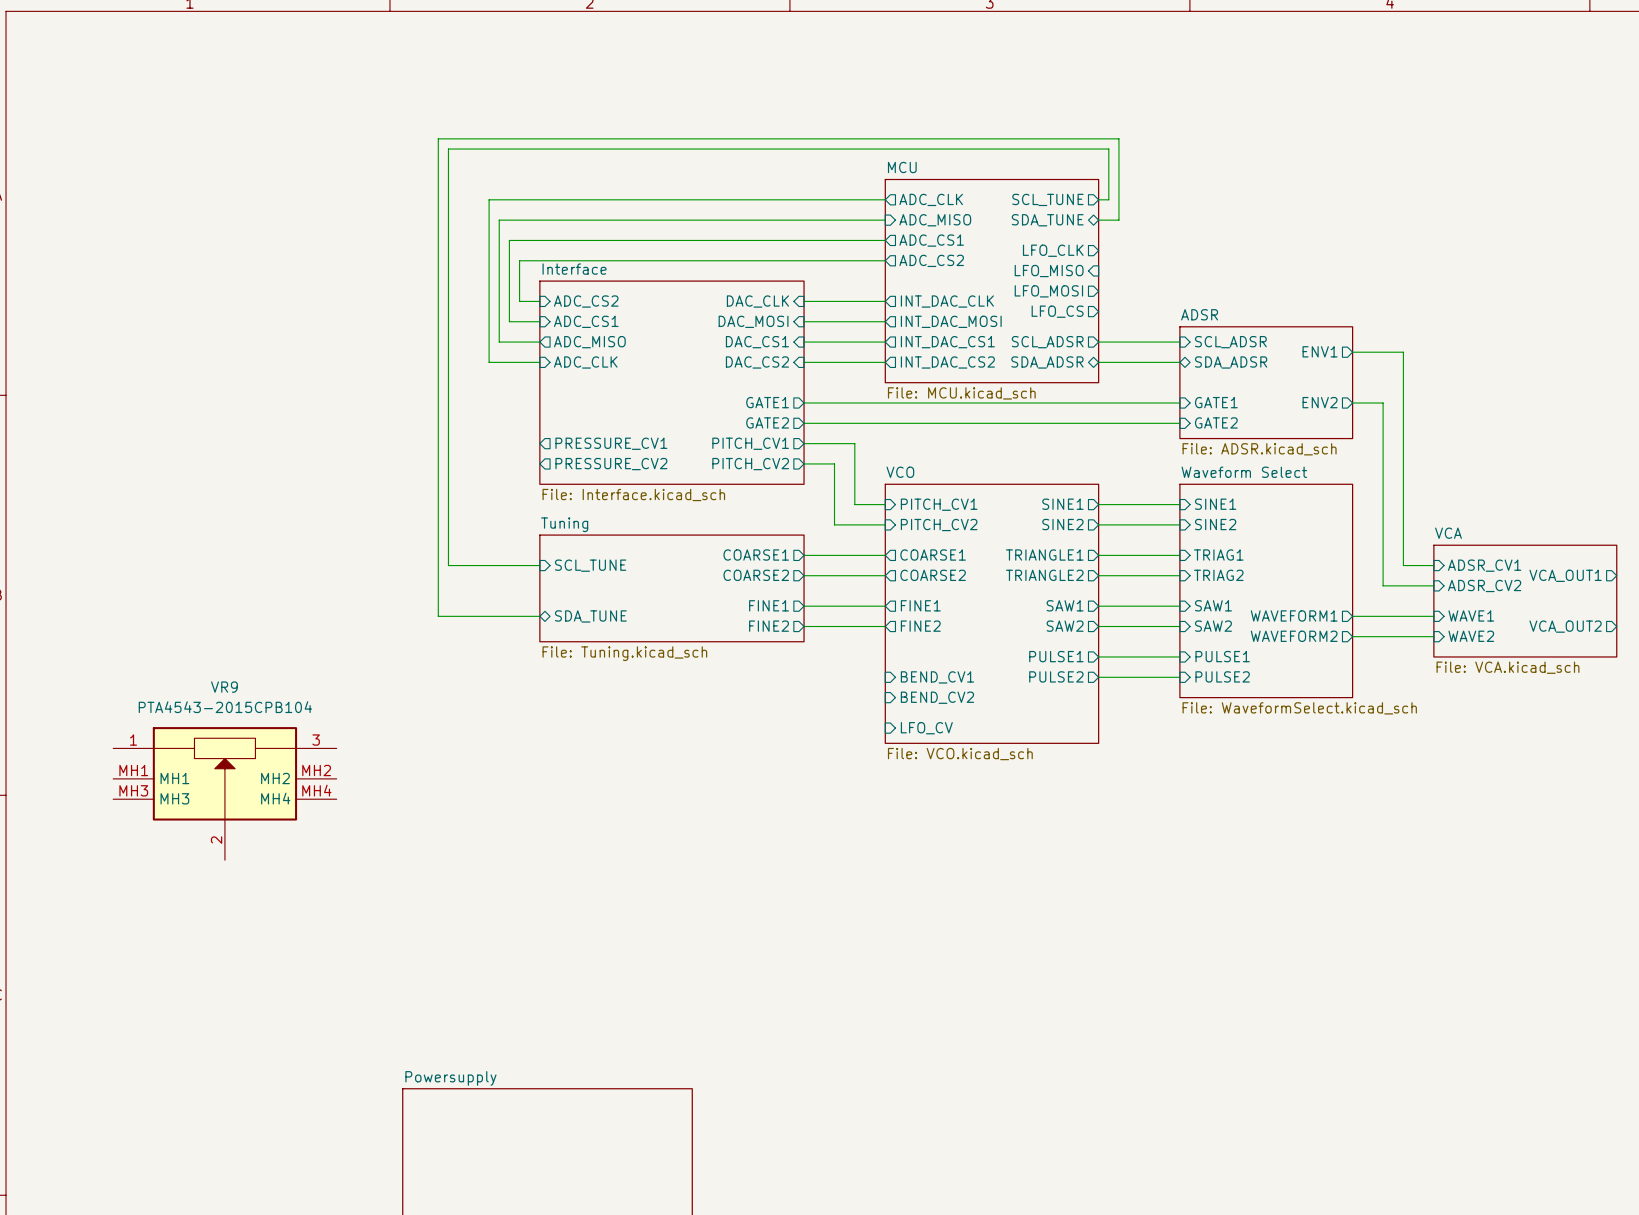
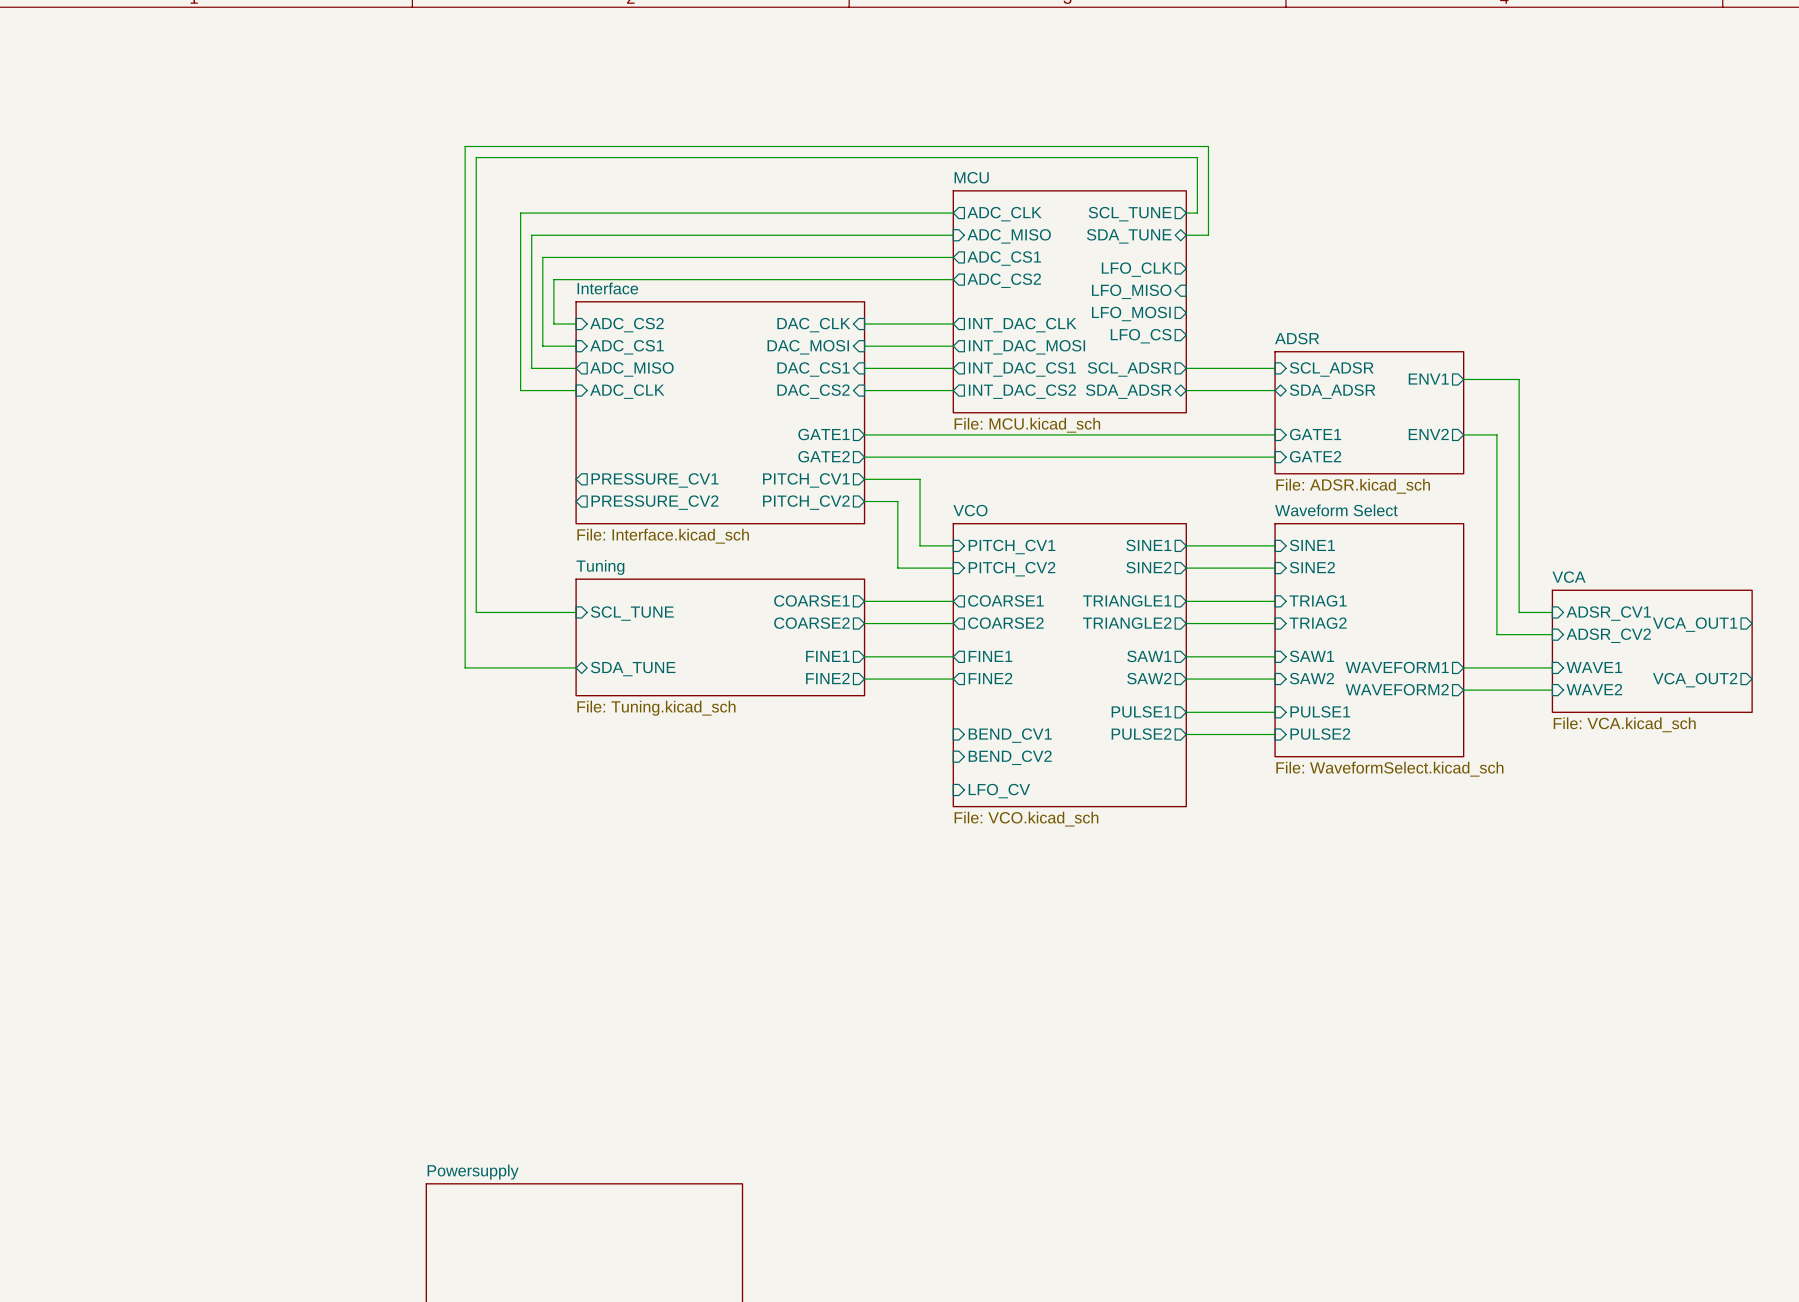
VR9: PTA4543-2015CPB104 (224, 793) -> none

